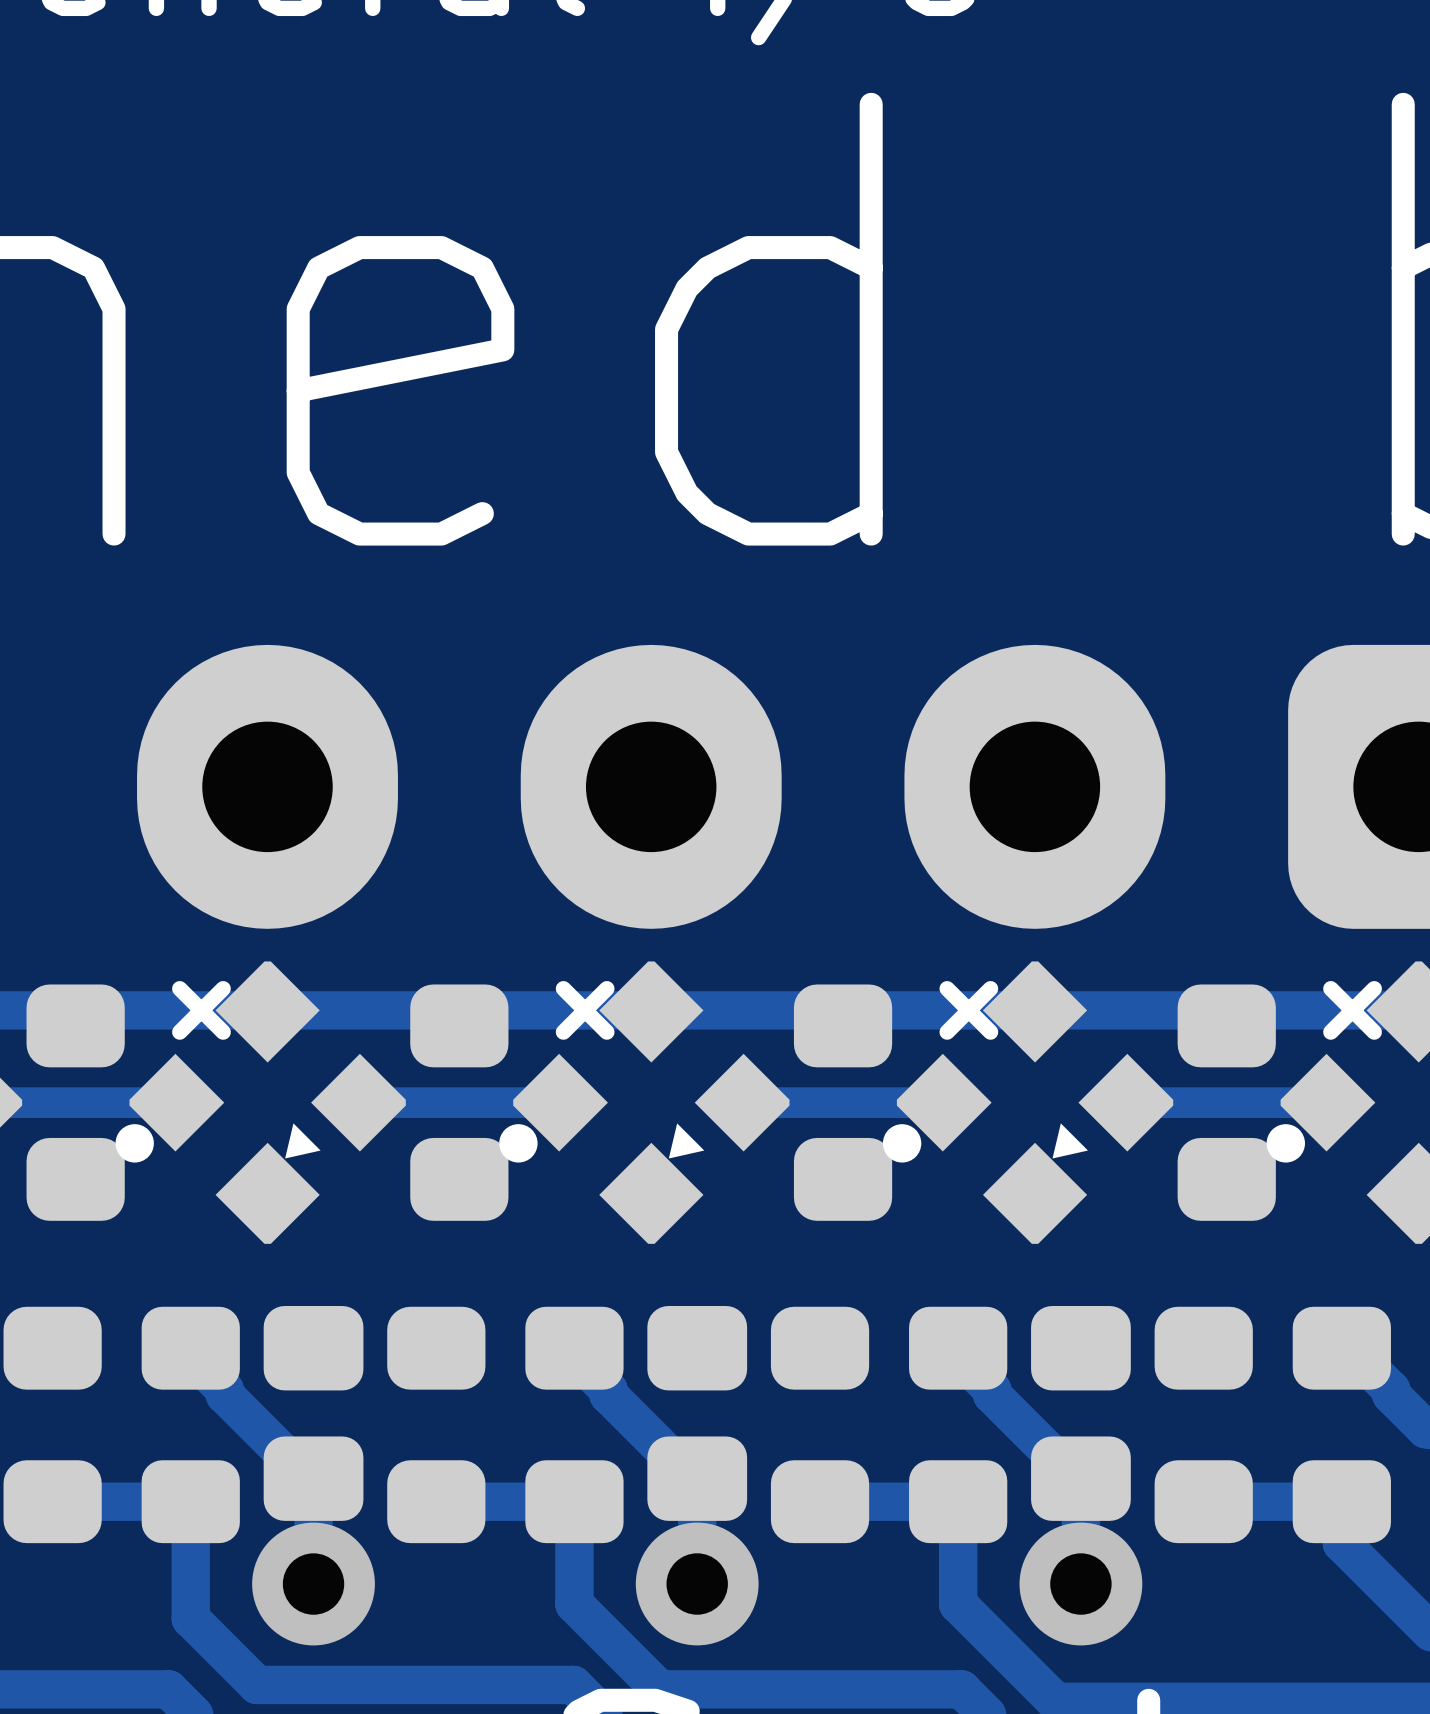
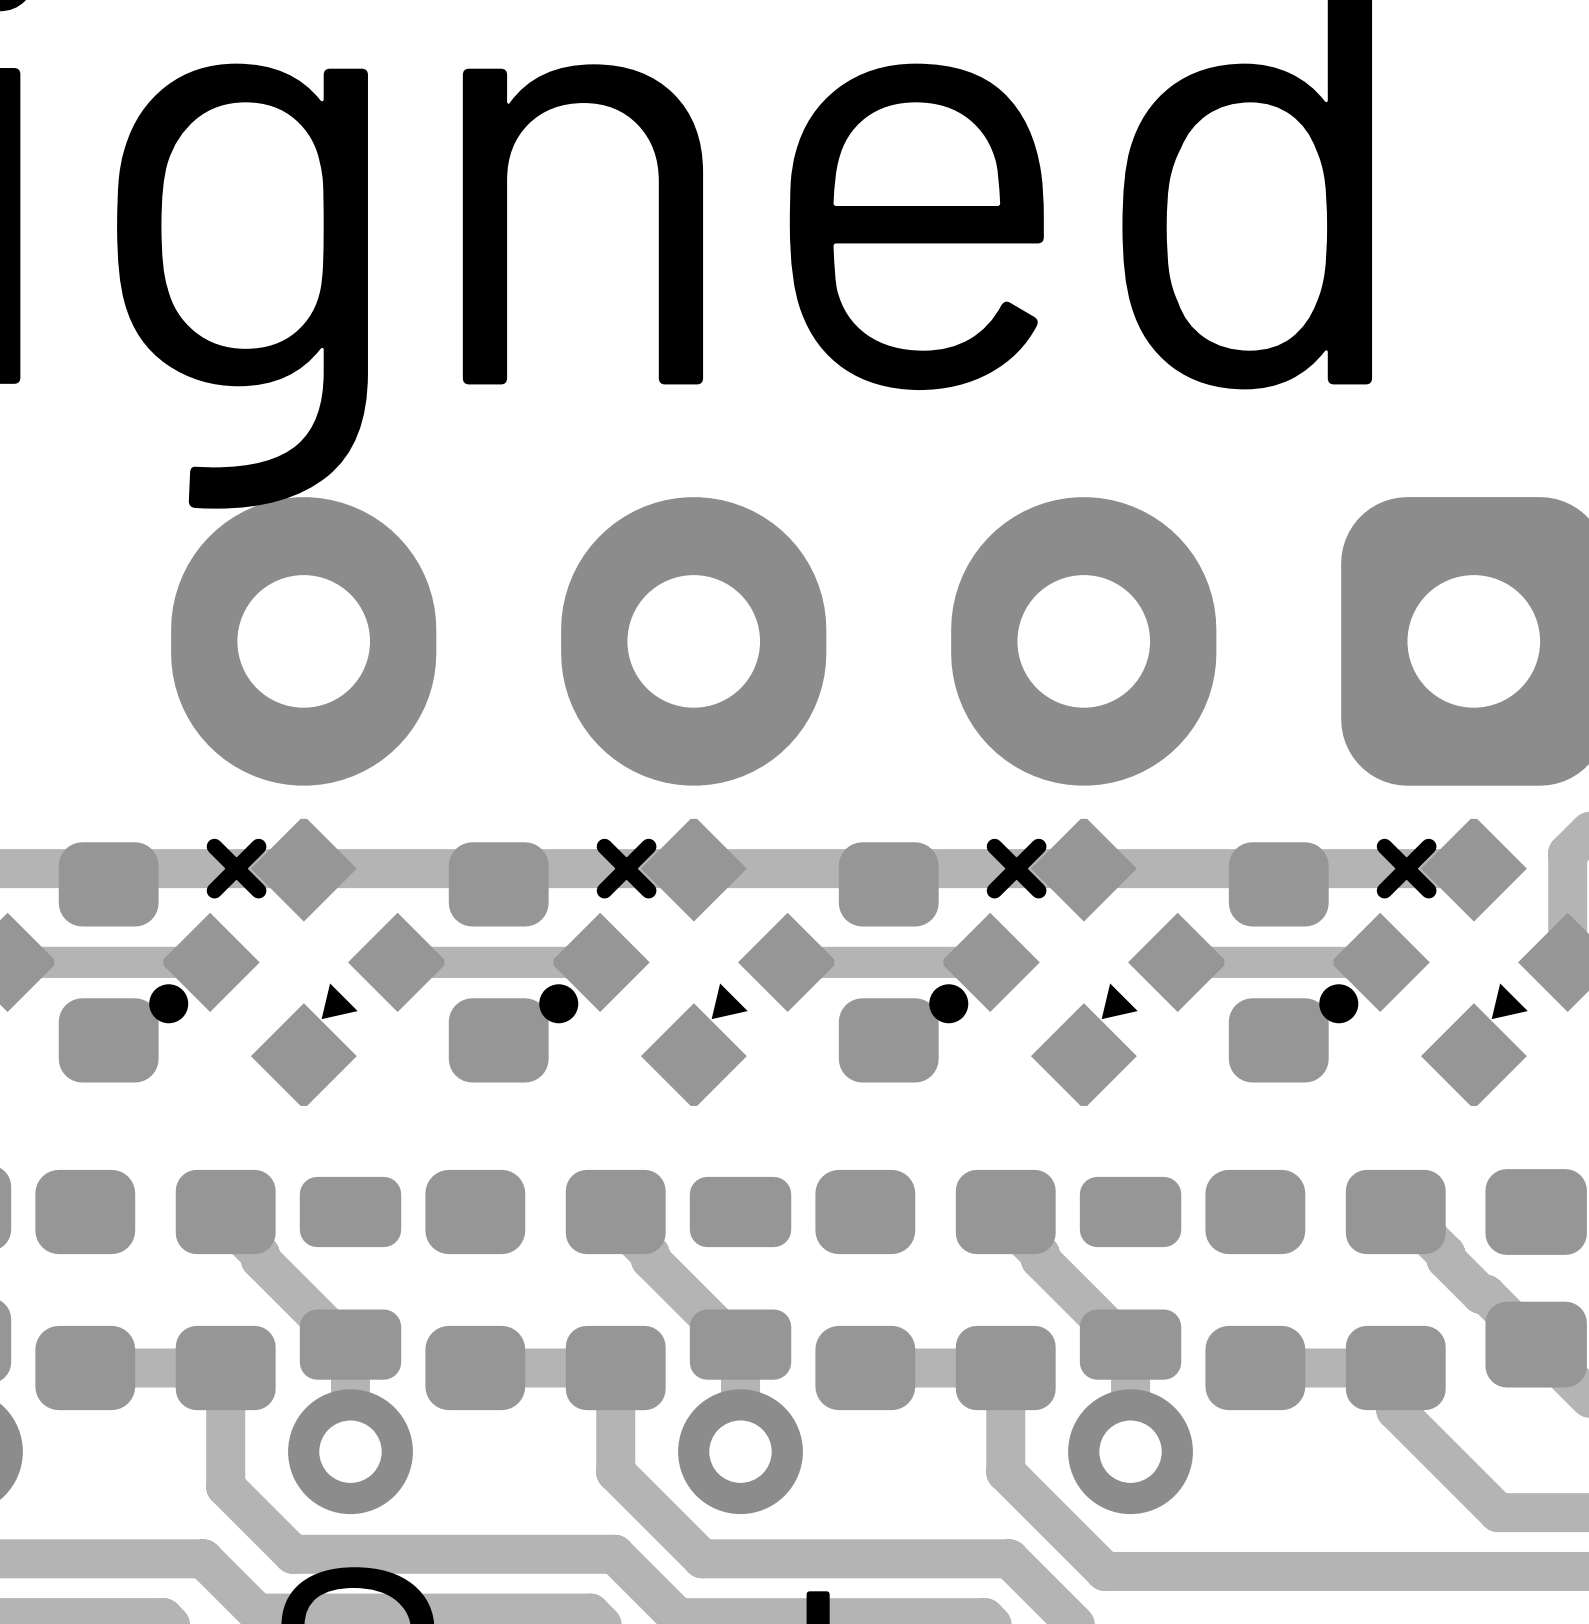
part footprint: [263, 1306, 364, 1521] -> [299, 1176, 402, 1380]
part footprint: [647, 1306, 748, 1521] -> [689, 1176, 792, 1380]
part footprint: [1031, 1306, 1131, 1521] -> [1079, 1176, 1182, 1380]

